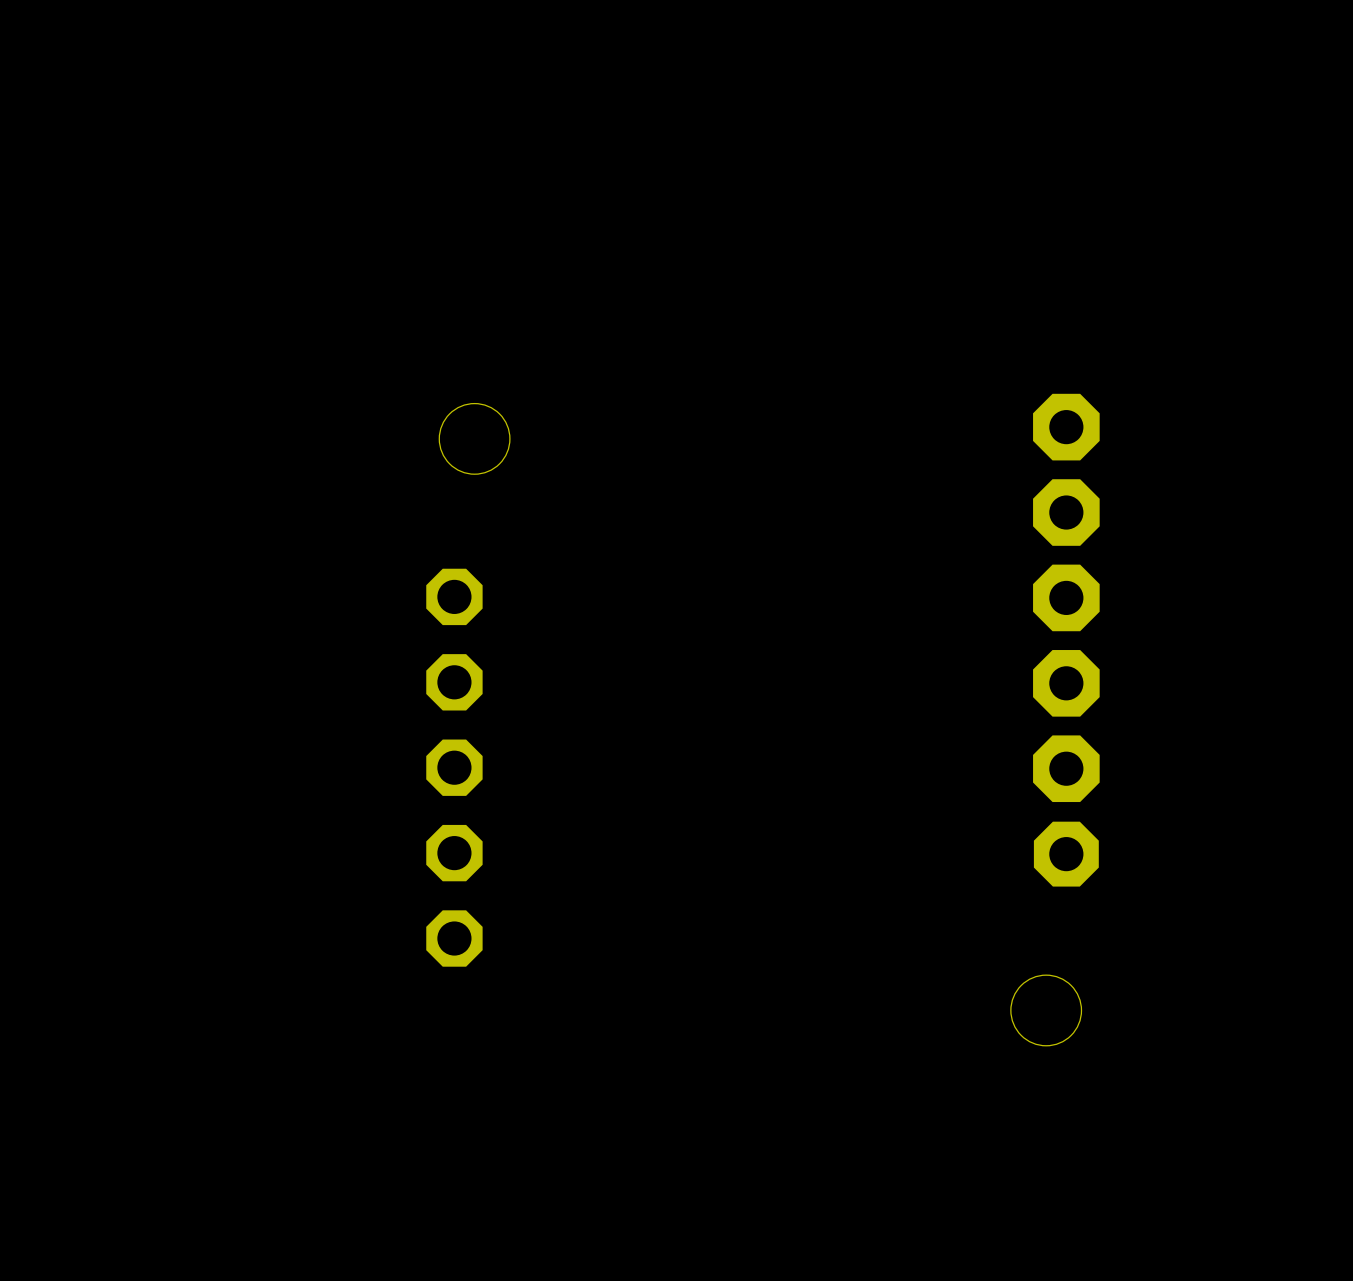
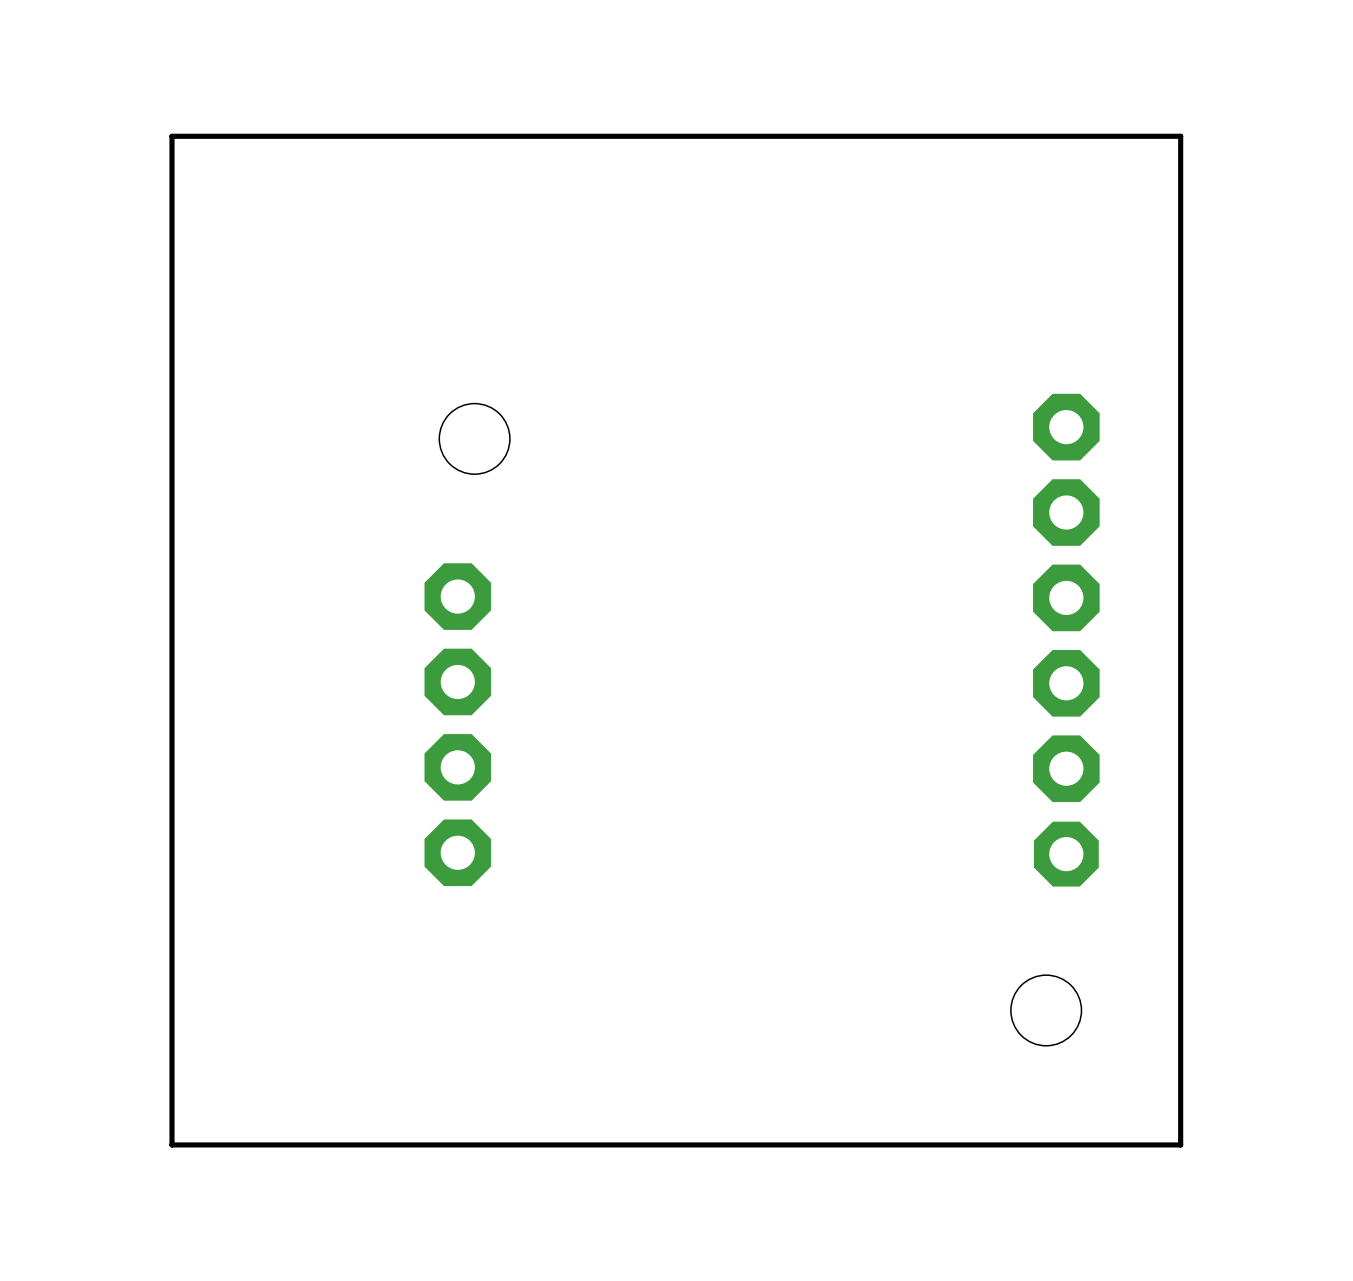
board edge: none -> (1180, 136) (1180, 1144) (172, 1144) (172, 136) (1180, 136)
part: none -> (457, 724)
part: (454, 767) -> none

